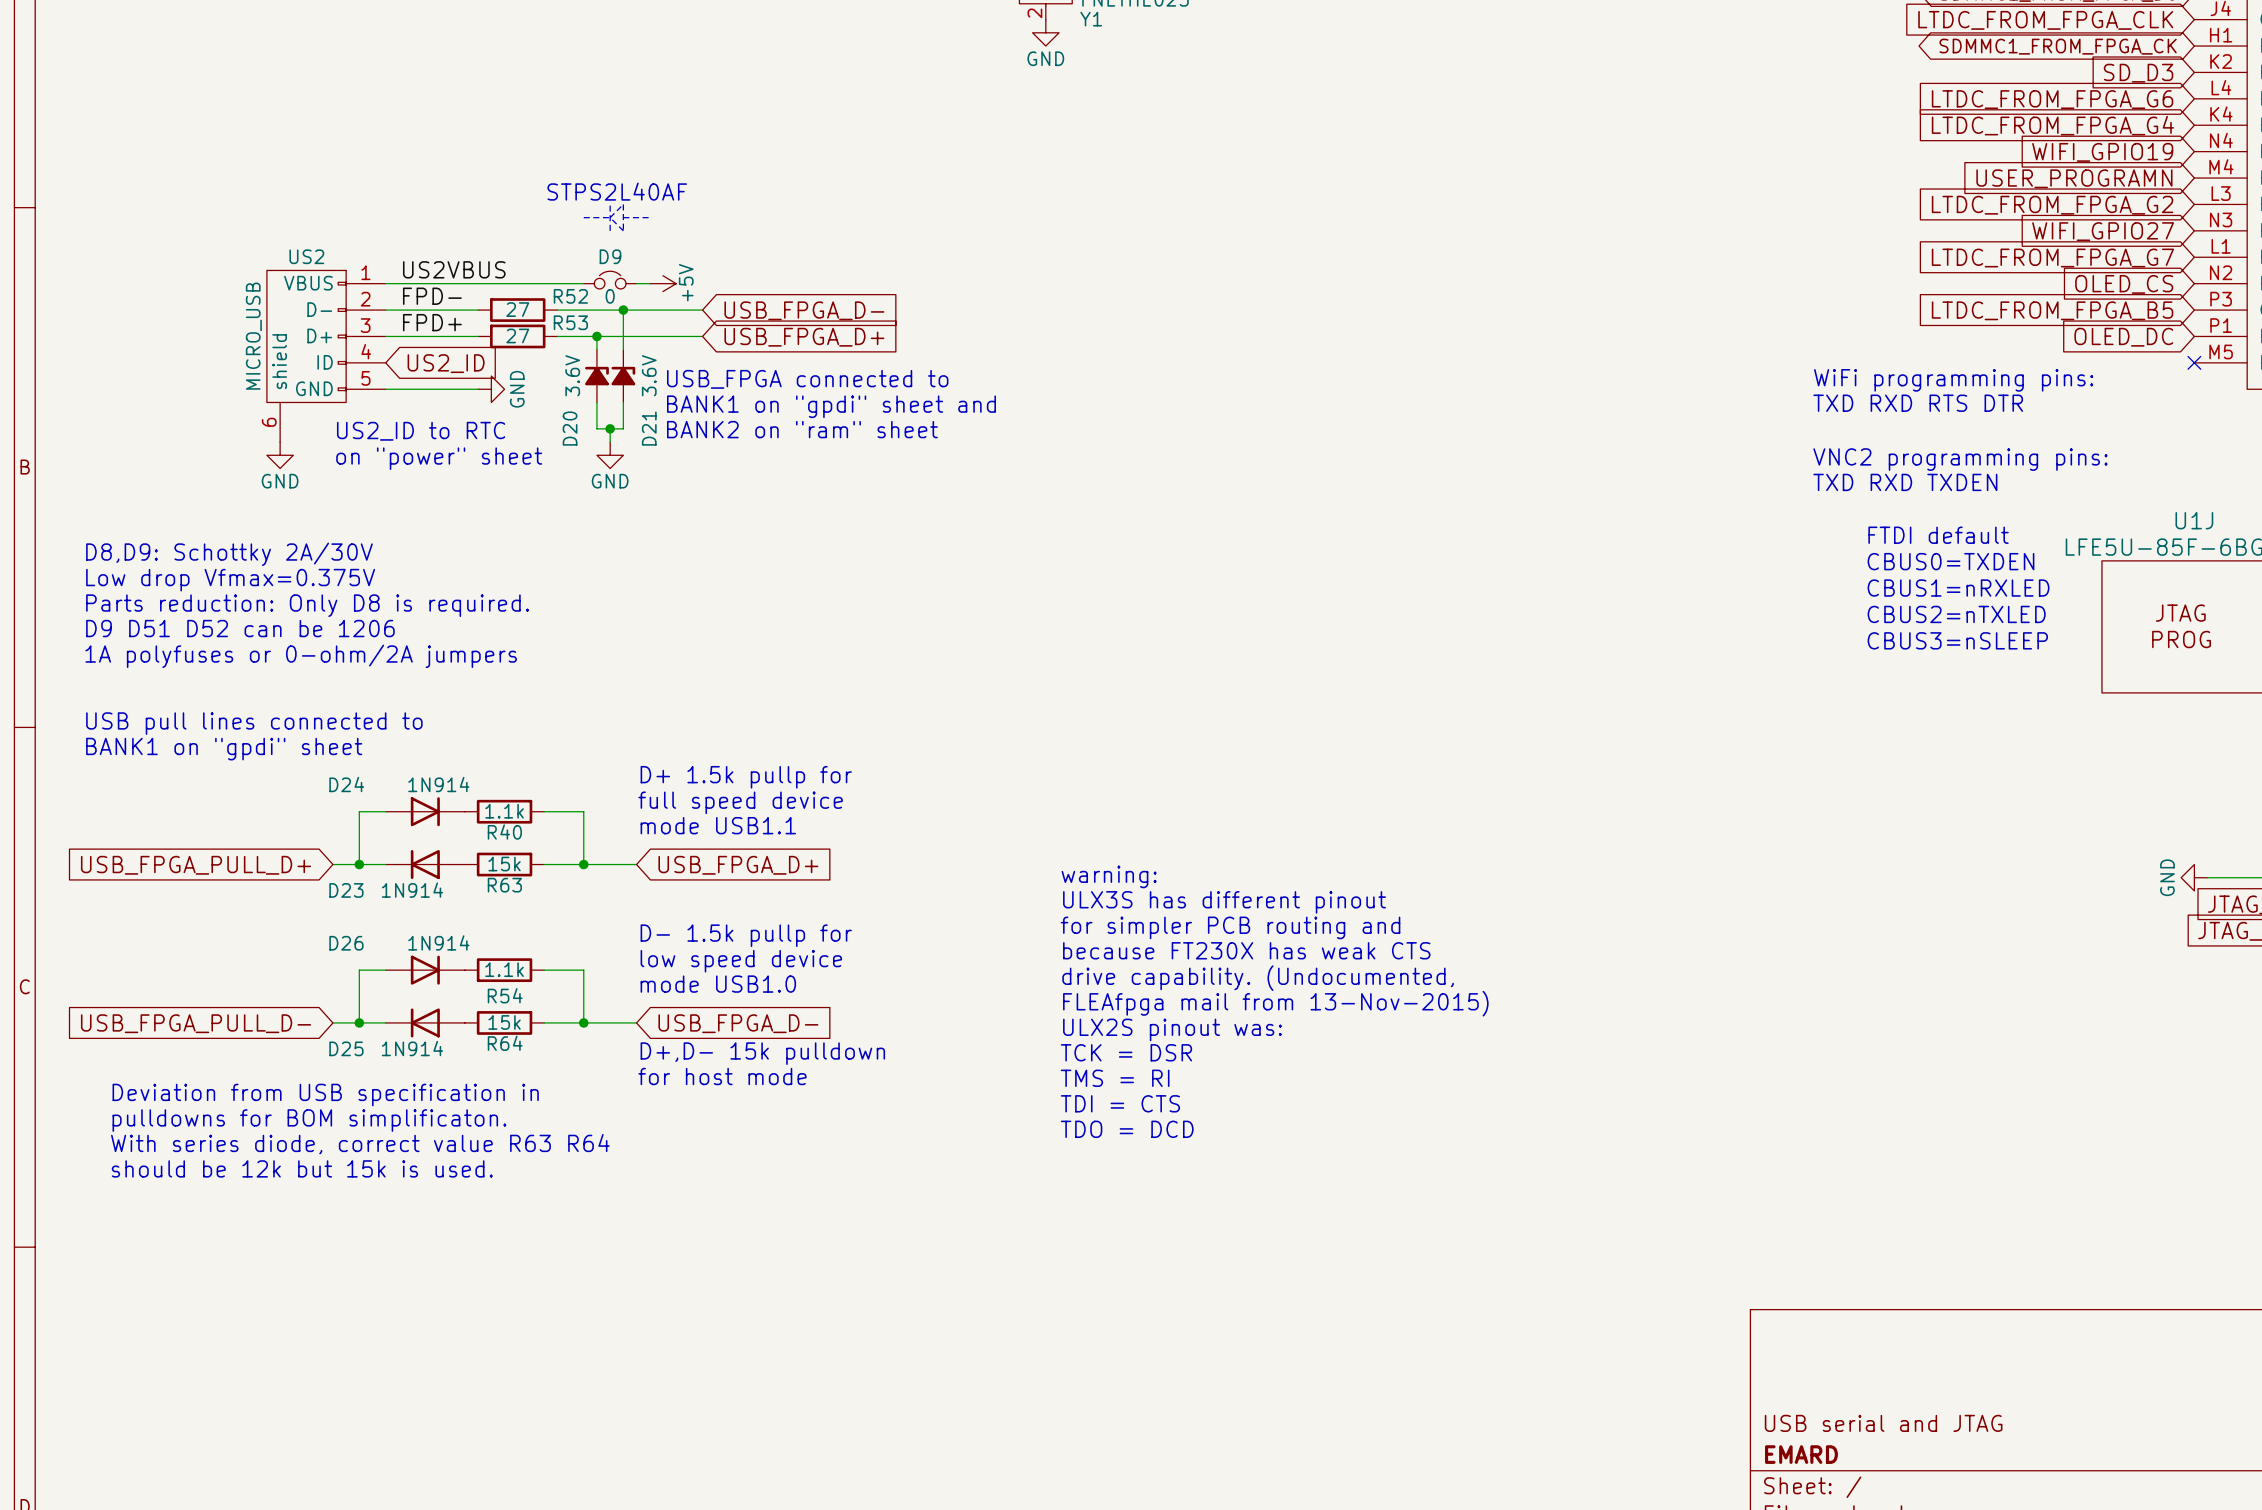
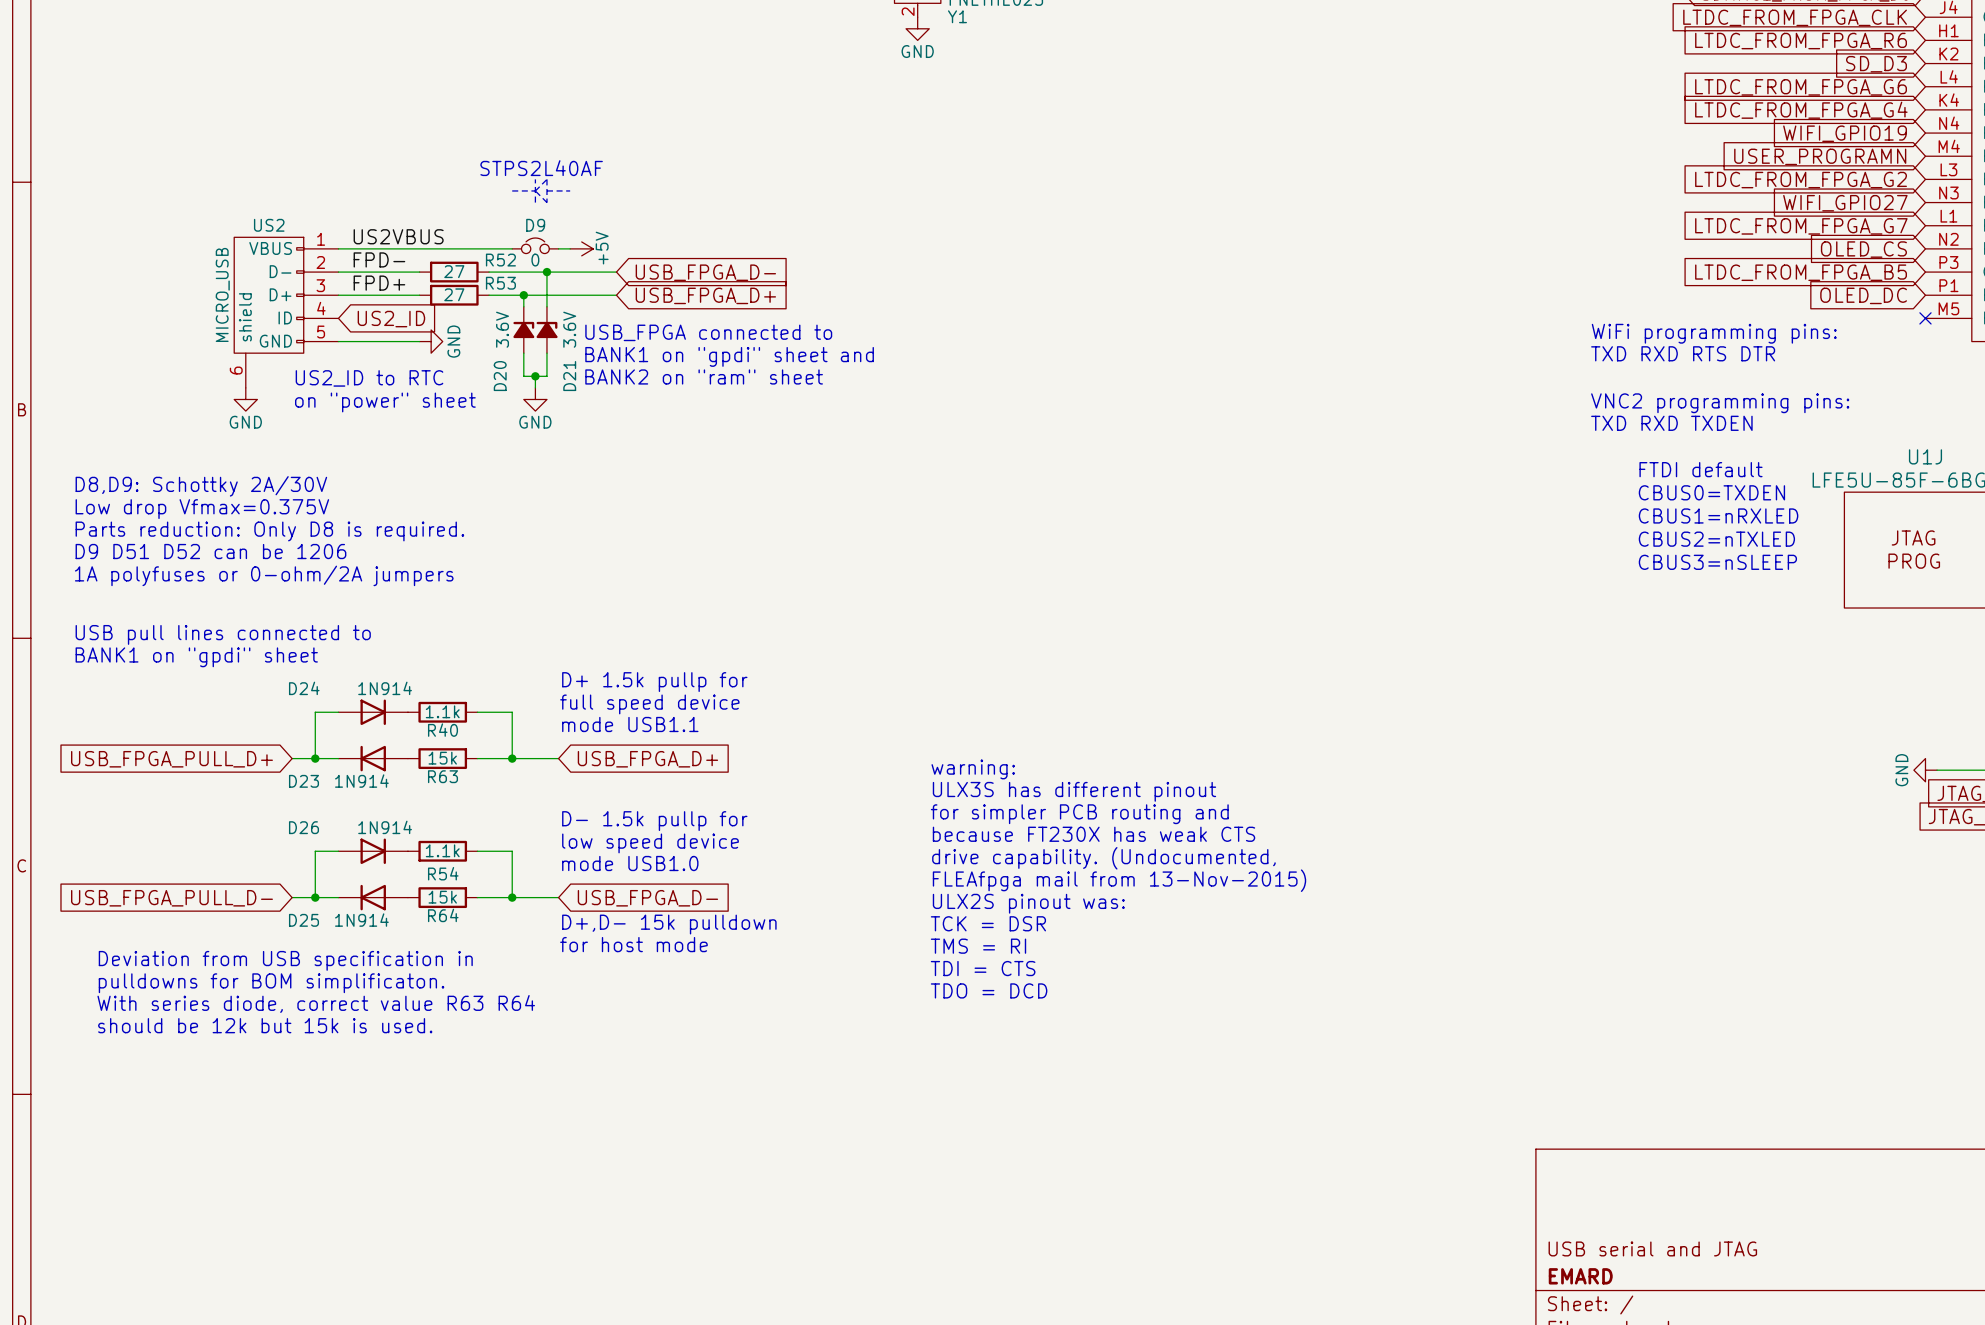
global label shape: bidirectional (2058, 46) -> input (1801, 41)
global label: SDMMC1_FROM_FPGA_CK (2058, 46) -> LTDC_FROM_FPGA_R6 (1801, 41)

